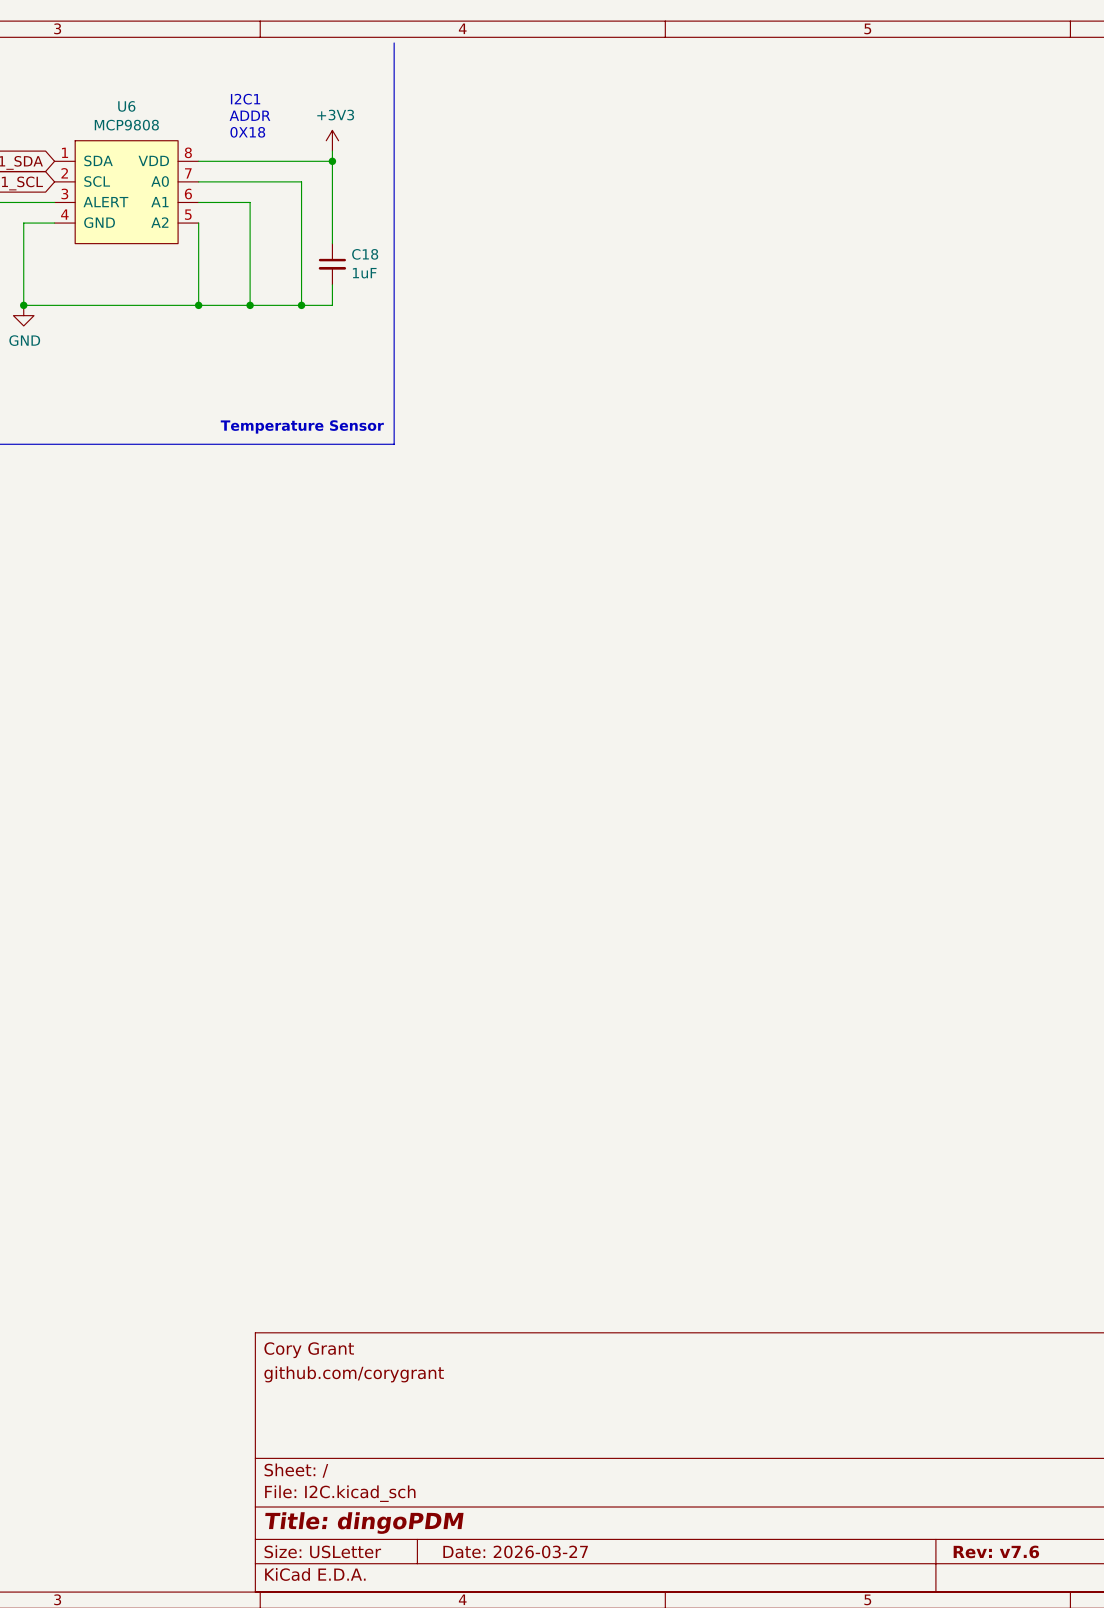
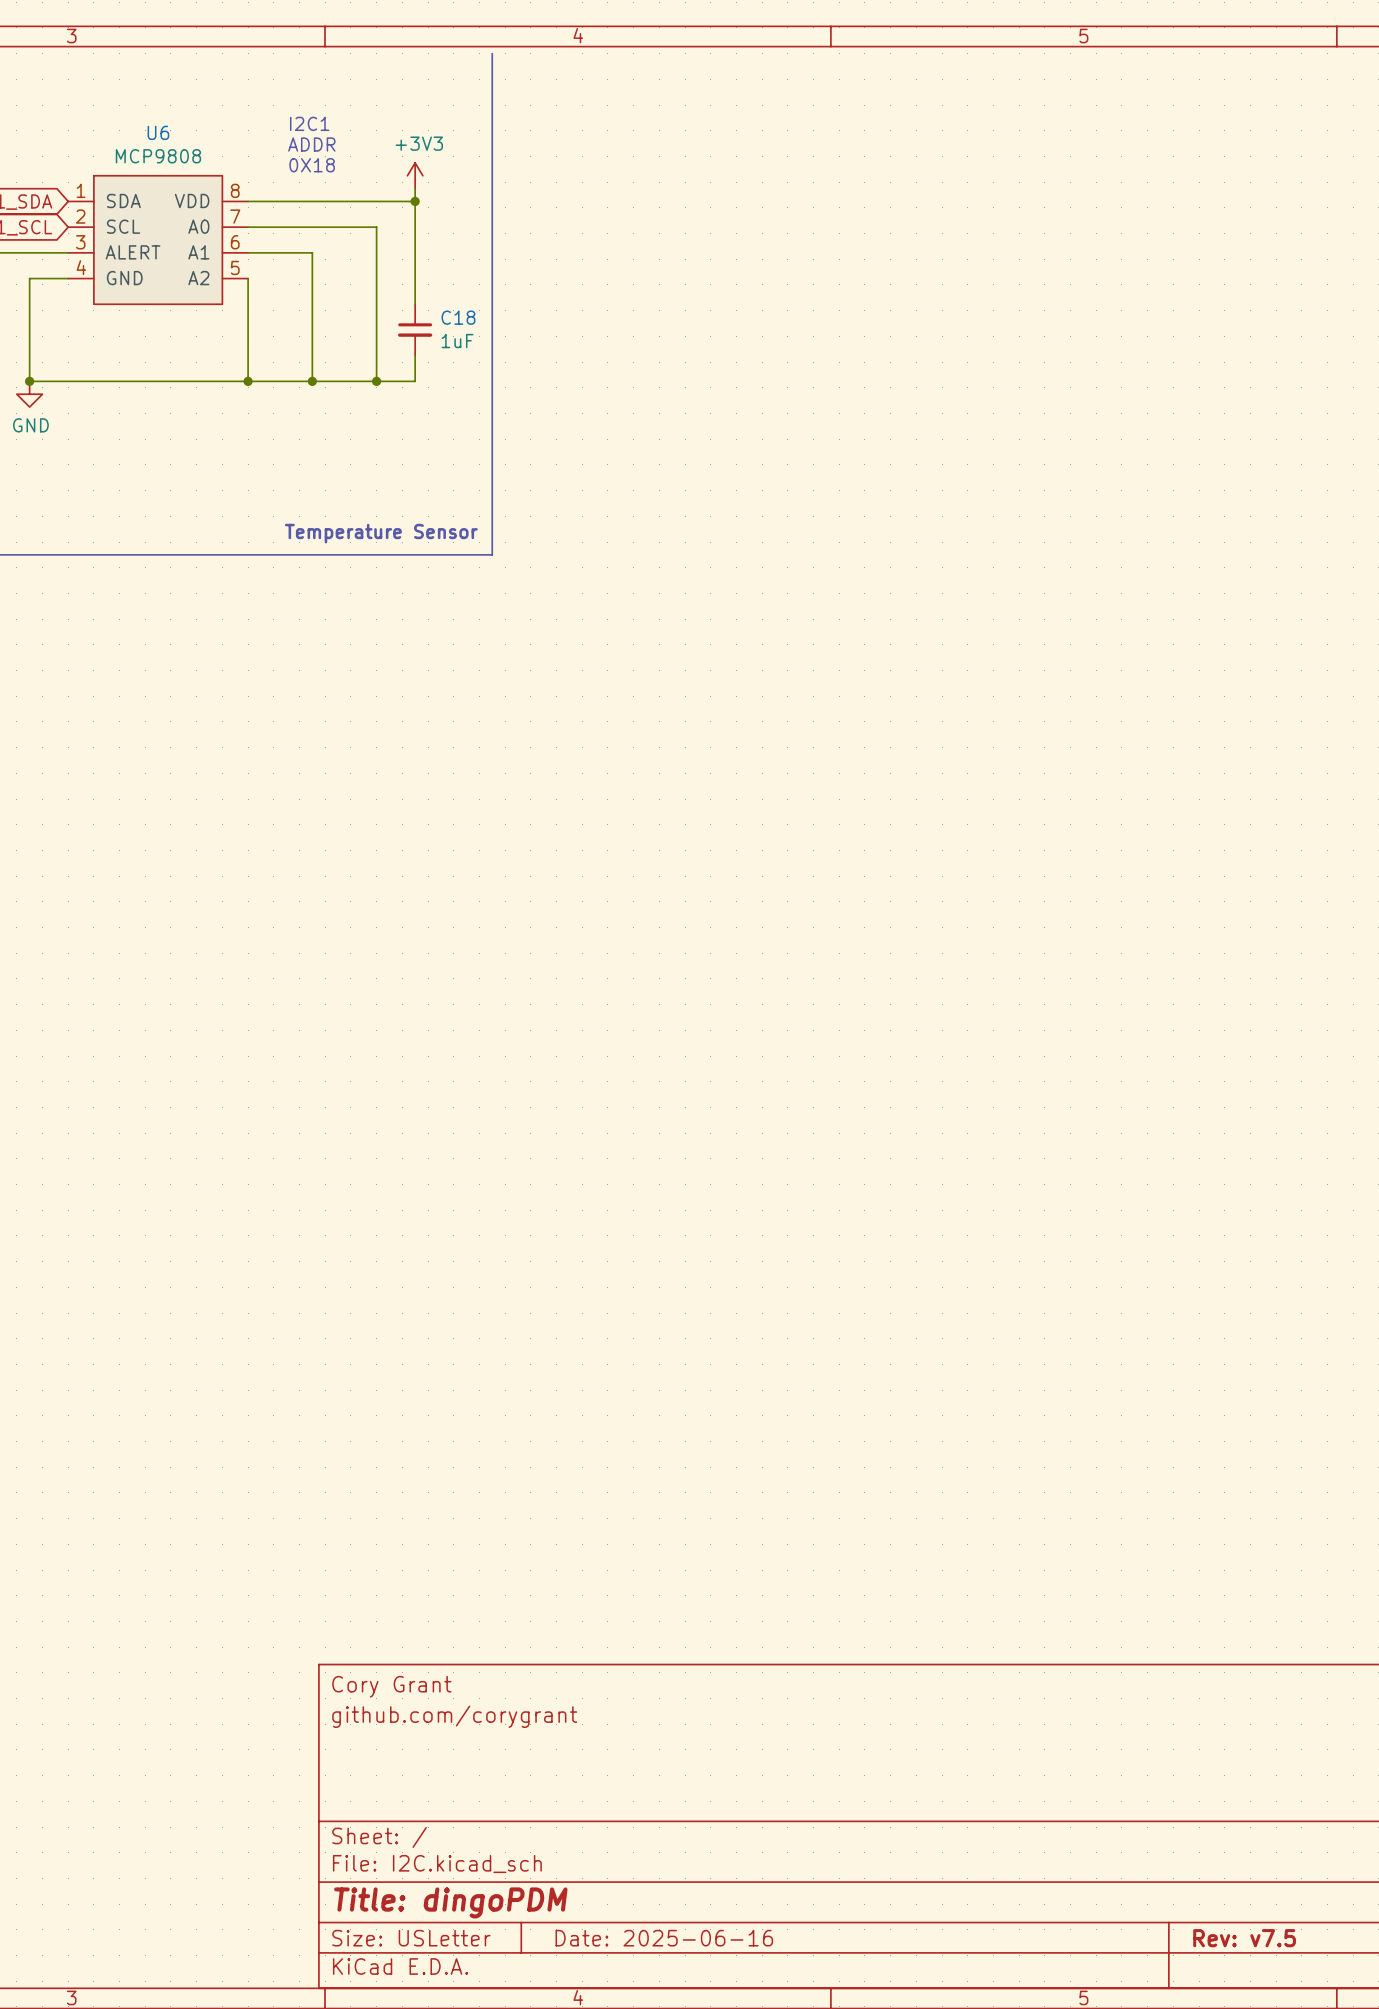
title block: Date: 2026-03-27 (515, 1551) -> Date: 2025-06-16 (664, 1938)
title block: Rev: v7.6 (996, 1551) -> Rev: v7.5 (1244, 1938)

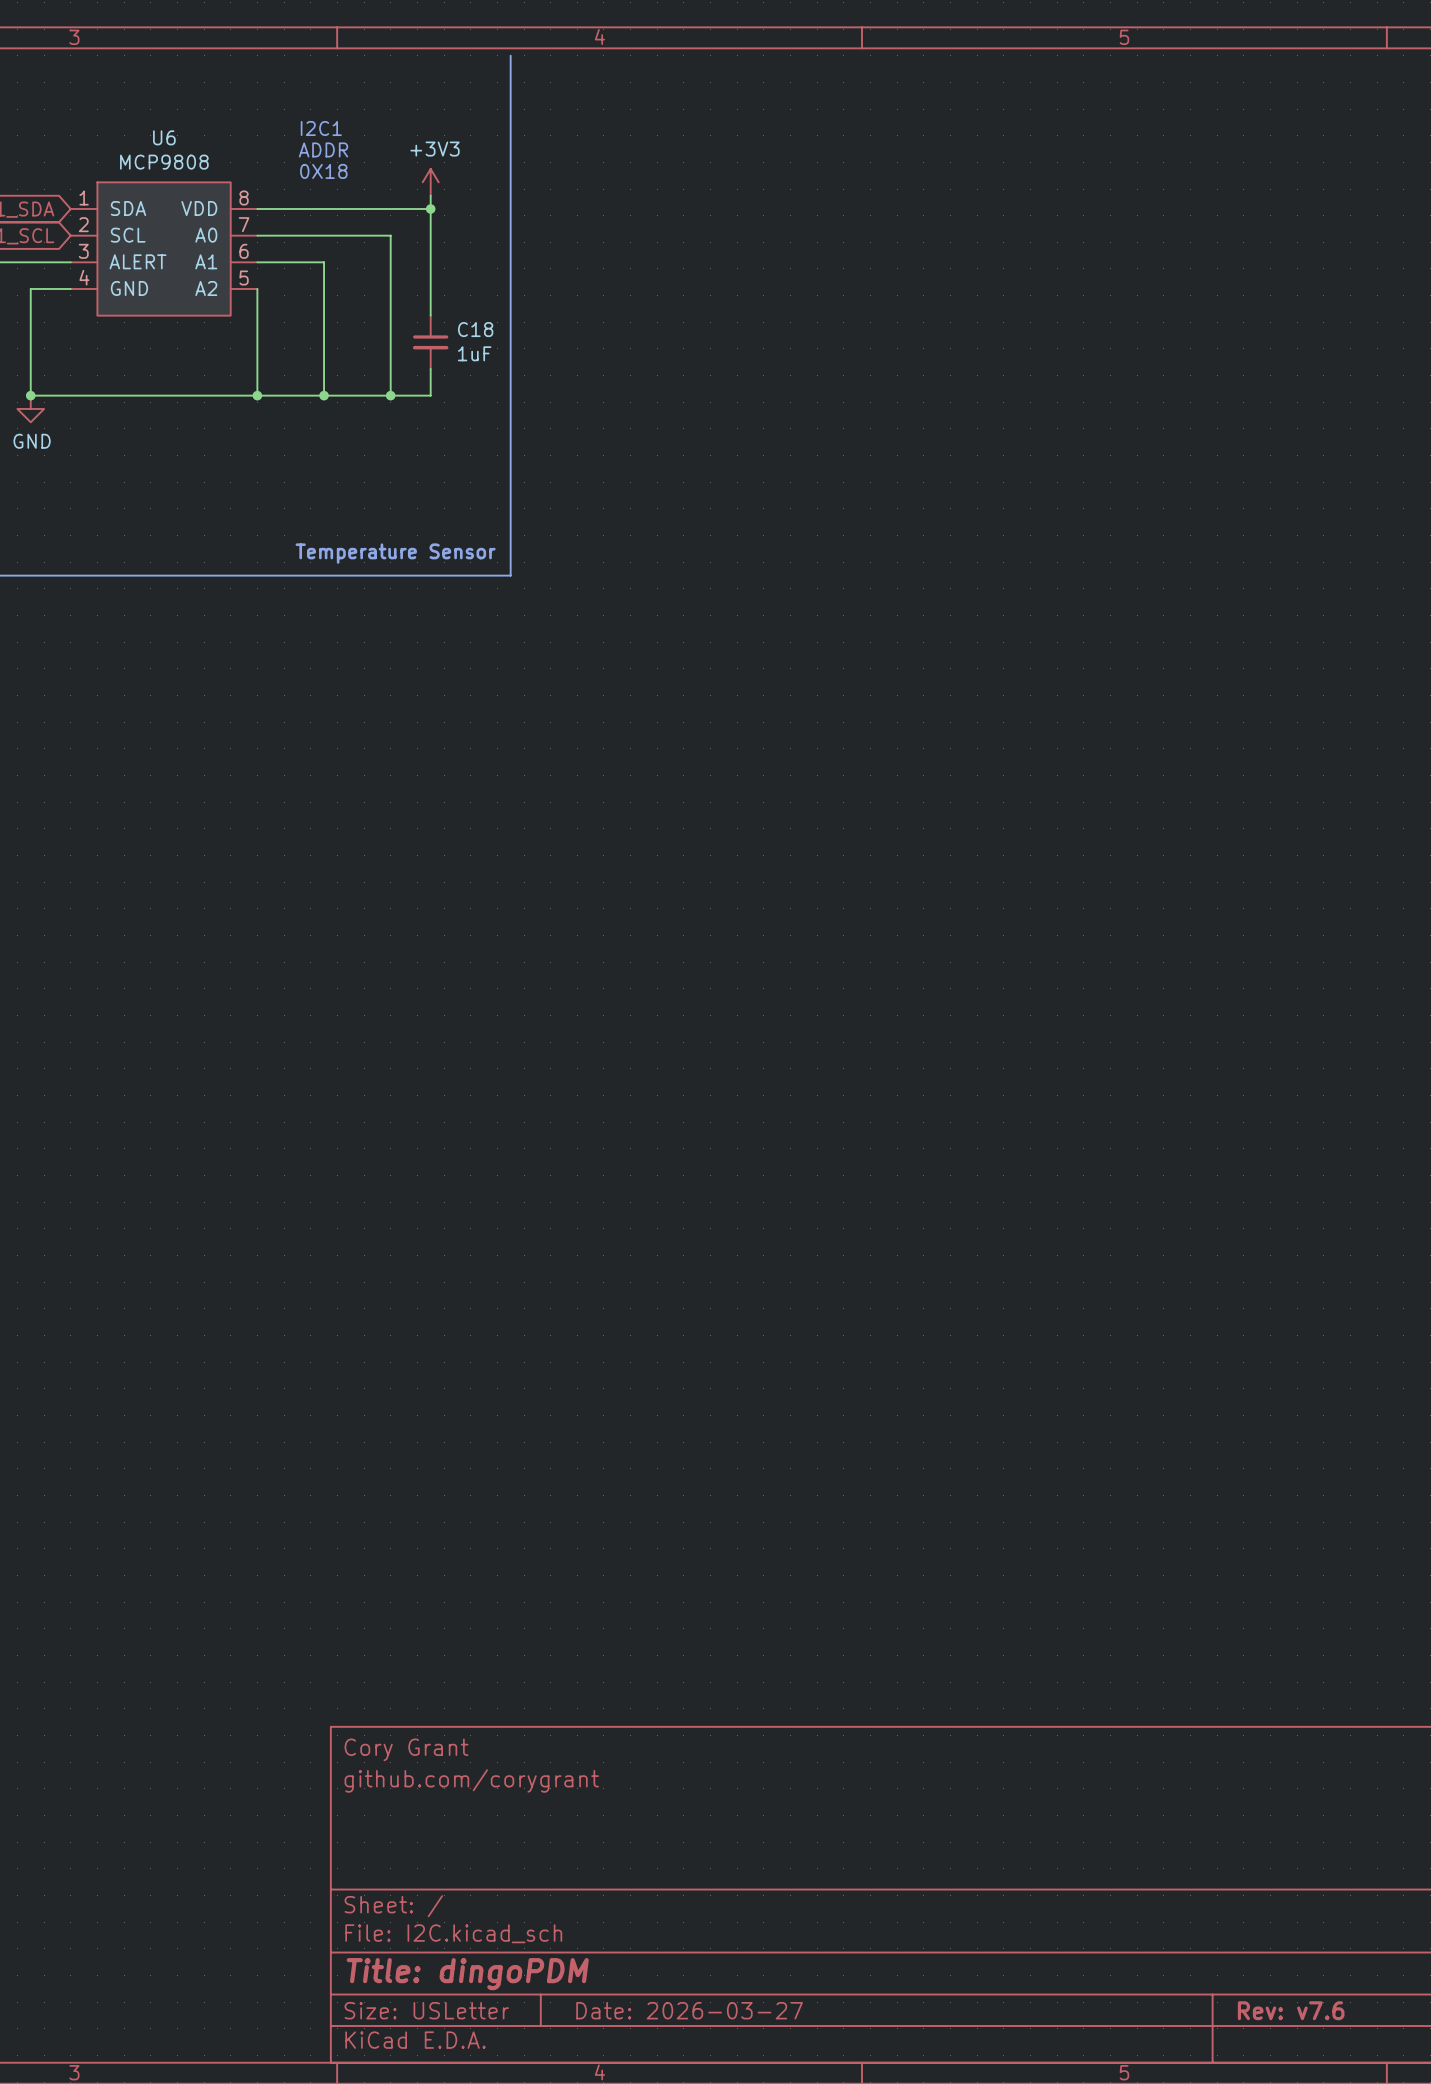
title block: Date: 2025-06-16 (664, 1938) -> Date: 2026-03-27 (689, 2010)
title block: Rev: v7.5 (1244, 1938) -> Rev: v7.6 (1291, 2010)

